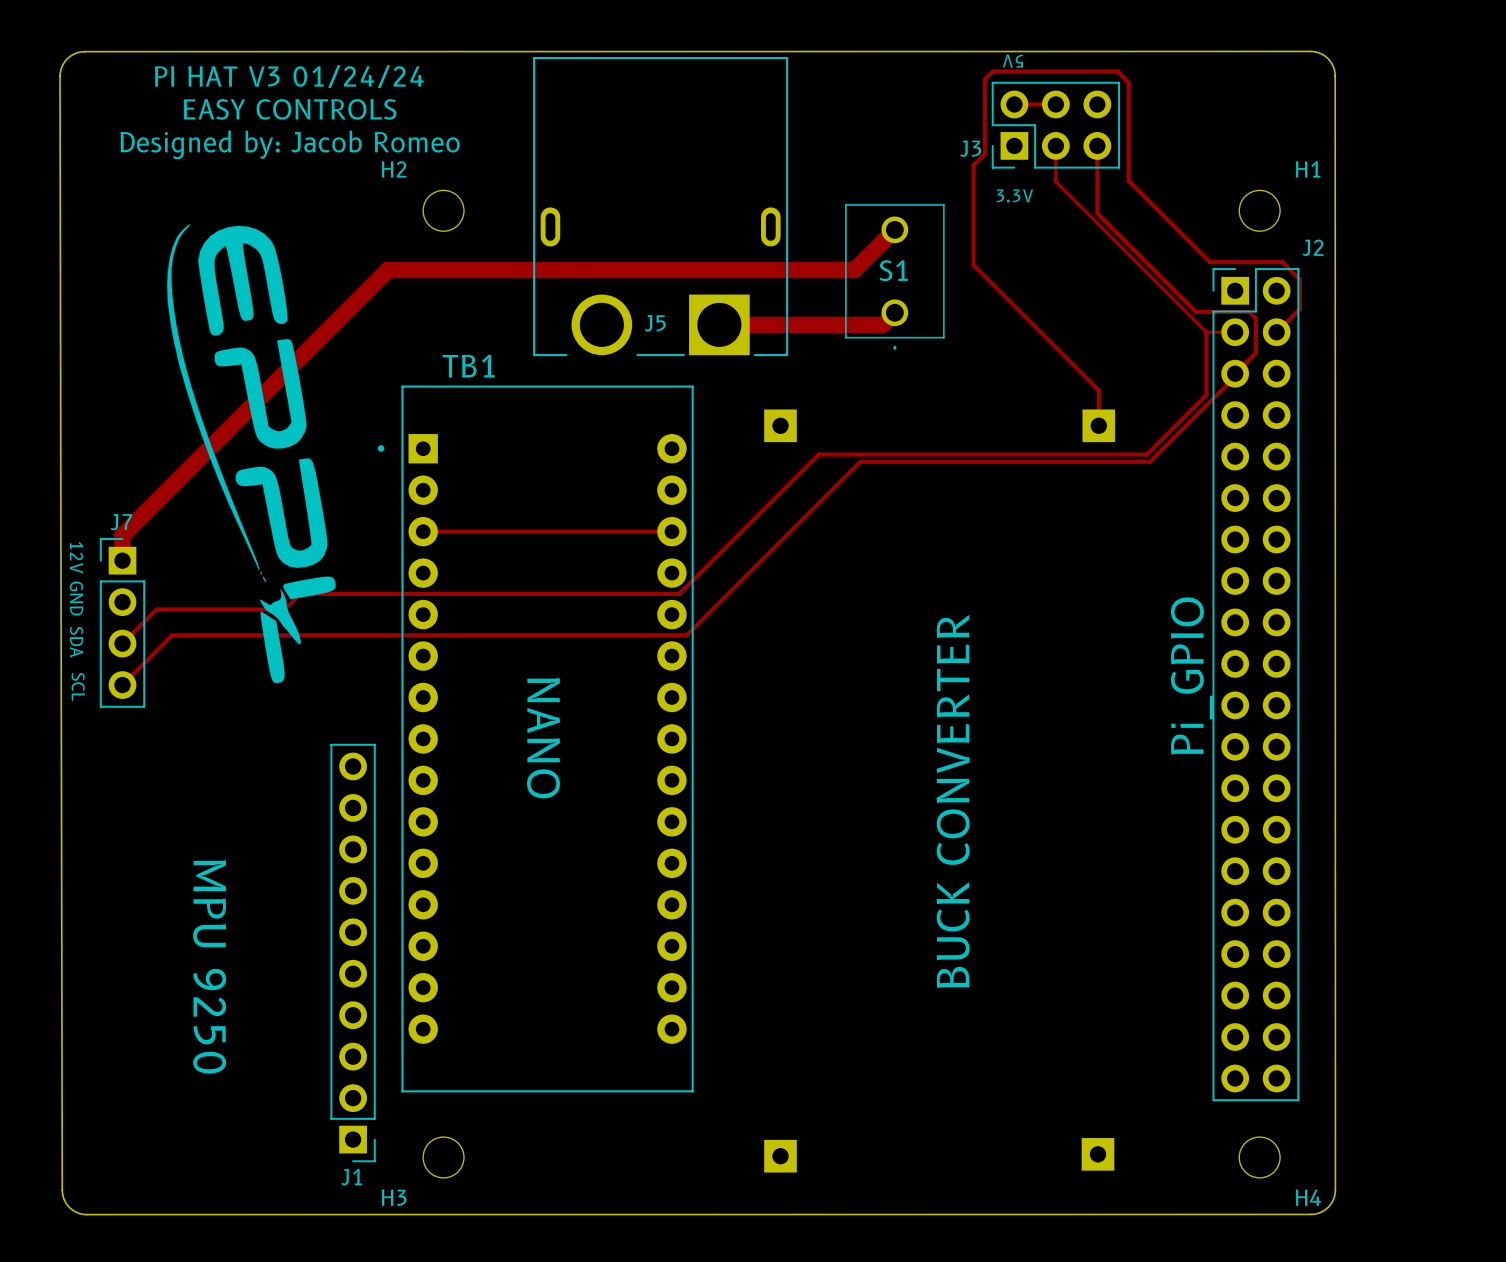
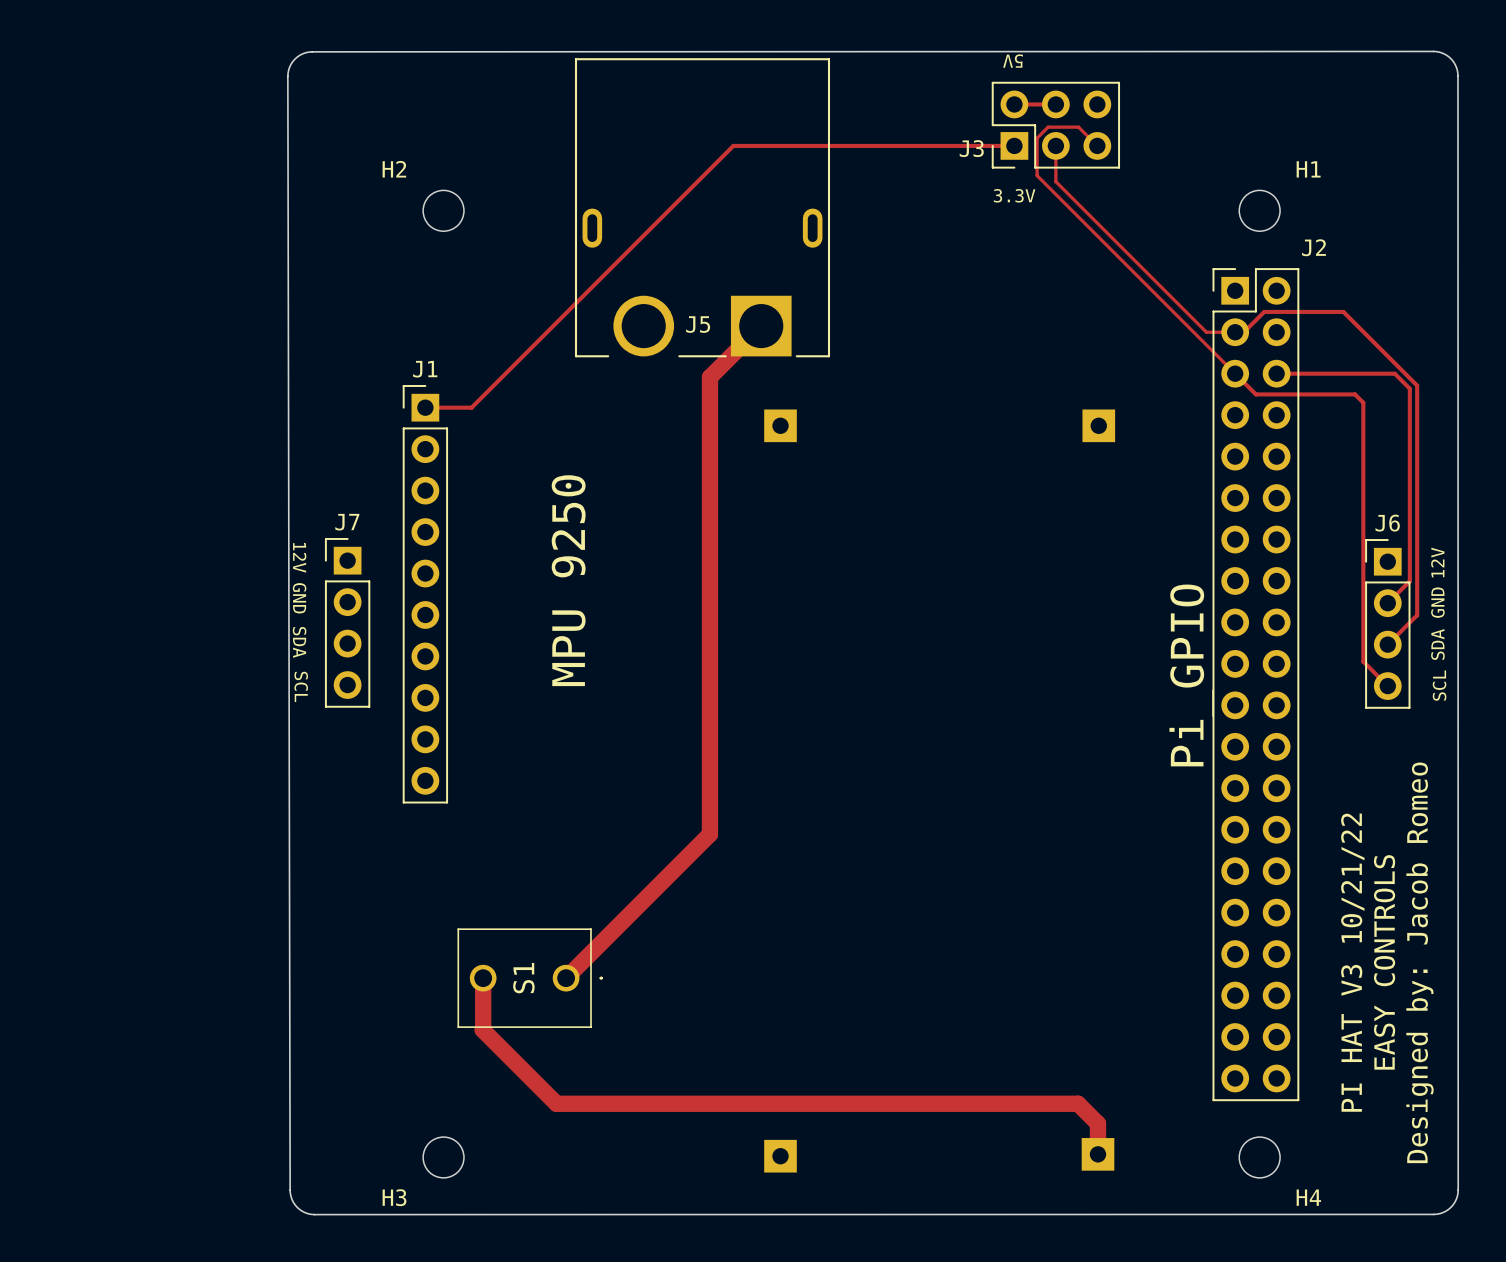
text: PI HAT V3 01/24/24 (289, 76) -> none
text: EASY CONTROLS (290, 109) -> none
text: Designed by: Jacob Romeo (290, 144) -> none
track: none -> (1014, 145) (733, 145) (471, 407) (425, 407)
track: (1097, 145) (1097, 213) (1195, 311) (1249, 311) (1255, 318) (1255, 352) (1235, 373) (1235, 376) (1149, 461) (860, 461) (686, 635) (172, 635) (122, 685) -> (1097, 145) (1078, 127) (1048, 127) (1037, 138) (1037, 175) (1255, 394) (1355, 394) (1363, 402) (1363, 661) (1387, 686)
J5 position: (660, 206) -> (702, 207)
drawing: [167, 224, 336, 684] -> none
track: (894, 229) (854, 270) (387, 270) (122, 535) (122, 560) -> none
S1 rotation: 0° (894, 276) -> 90° counterclockwise (530, 978)
S1 position: (894, 276) -> (530, 978)
track: (894, 312) (882, 324) (719, 324) -> none
track: none -> (761, 326) (709, 377) (709, 834) (566, 978)
track: (1206, 332) (1206, 395) (1146, 454) (818, 454) (679, 593) (300, 593) (284, 609) (156, 609) (122, 643) -> none
track: none -> (1235, 332) (1243, 332) (1264, 311) (1343, 311) (1417, 385) (1417, 615) (1387, 644)
track: (1276, 332) (1299, 308) (1299, 279) (1282, 262) (1209, 262) (1128, 180) (1128, 82) (1117, 71) (992, 71) (984, 79) (984, 153) (973, 165) (973, 265) (1098, 390) (1098, 425) -> none
track: none -> (1276, 373) (1394, 373) (1409, 388) (1409, 581) (1387, 603)
track: (423, 531) (671, 531) -> none
text position: 12V (76, 557) -> 12V (299, 557)
text: none -> 12V (1437, 562)
text: none -> MPU 9250 (568, 580)
text position: GND (76, 598) -> GND (299, 598)
text: none -> GND (1437, 602)
J7 position: (122, 622) -> (347, 622)
J6: none -> (1387, 623)
text position: SDA (76, 642) -> SDA (299, 642)
text: none -> SDA (1437, 644)
text: none -> SCL (1439, 685)
text position: SCL (78, 686) -> SCL (301, 686)
TB1: (535, 738) -> none
text: NANO (543, 738) -> none
text: BUCK CONVERTER (953, 801) -> none
J1 rotation: 0° (353, 953) -> 180° (425, 594)
J1 position: (353, 953) -> (425, 594)
text: none -> EASY CONTROLS (1384, 962)
text: none -> Designed by: Jacob Romeo (1419, 962)
text: none -> PI HAT V3 10/21/22 (1352, 962)
text: MPU 9250 (209, 966) -> none
track: none -> (483, 978) (482, 1029) (556, 1103) (1078, 1103) (1098, 1123) (1098, 1154)
board edge: (1310, 1214) (1320, 1212) (1328, 1207) (1333, 1199) (1335, 1189) (1335, 75) (1333, 66) (1328, 58) (1320, 53) (1310, 51) (78, 52) (65, 61) (60, 76) (63, 1196) (69, 1207) (83, 1214) (314, 1214) -> (1310, 1214) (1436, 1214) (1451, 1207) (1458, 1193) (1457, 75) (1452, 60) (1444, 53) (1436, 51) (312, 51) (302, 53) (295, 59) (289, 66) (287, 76) (290, 1190) (292, 1199) (297, 1207) (305, 1212) (314, 1214)

